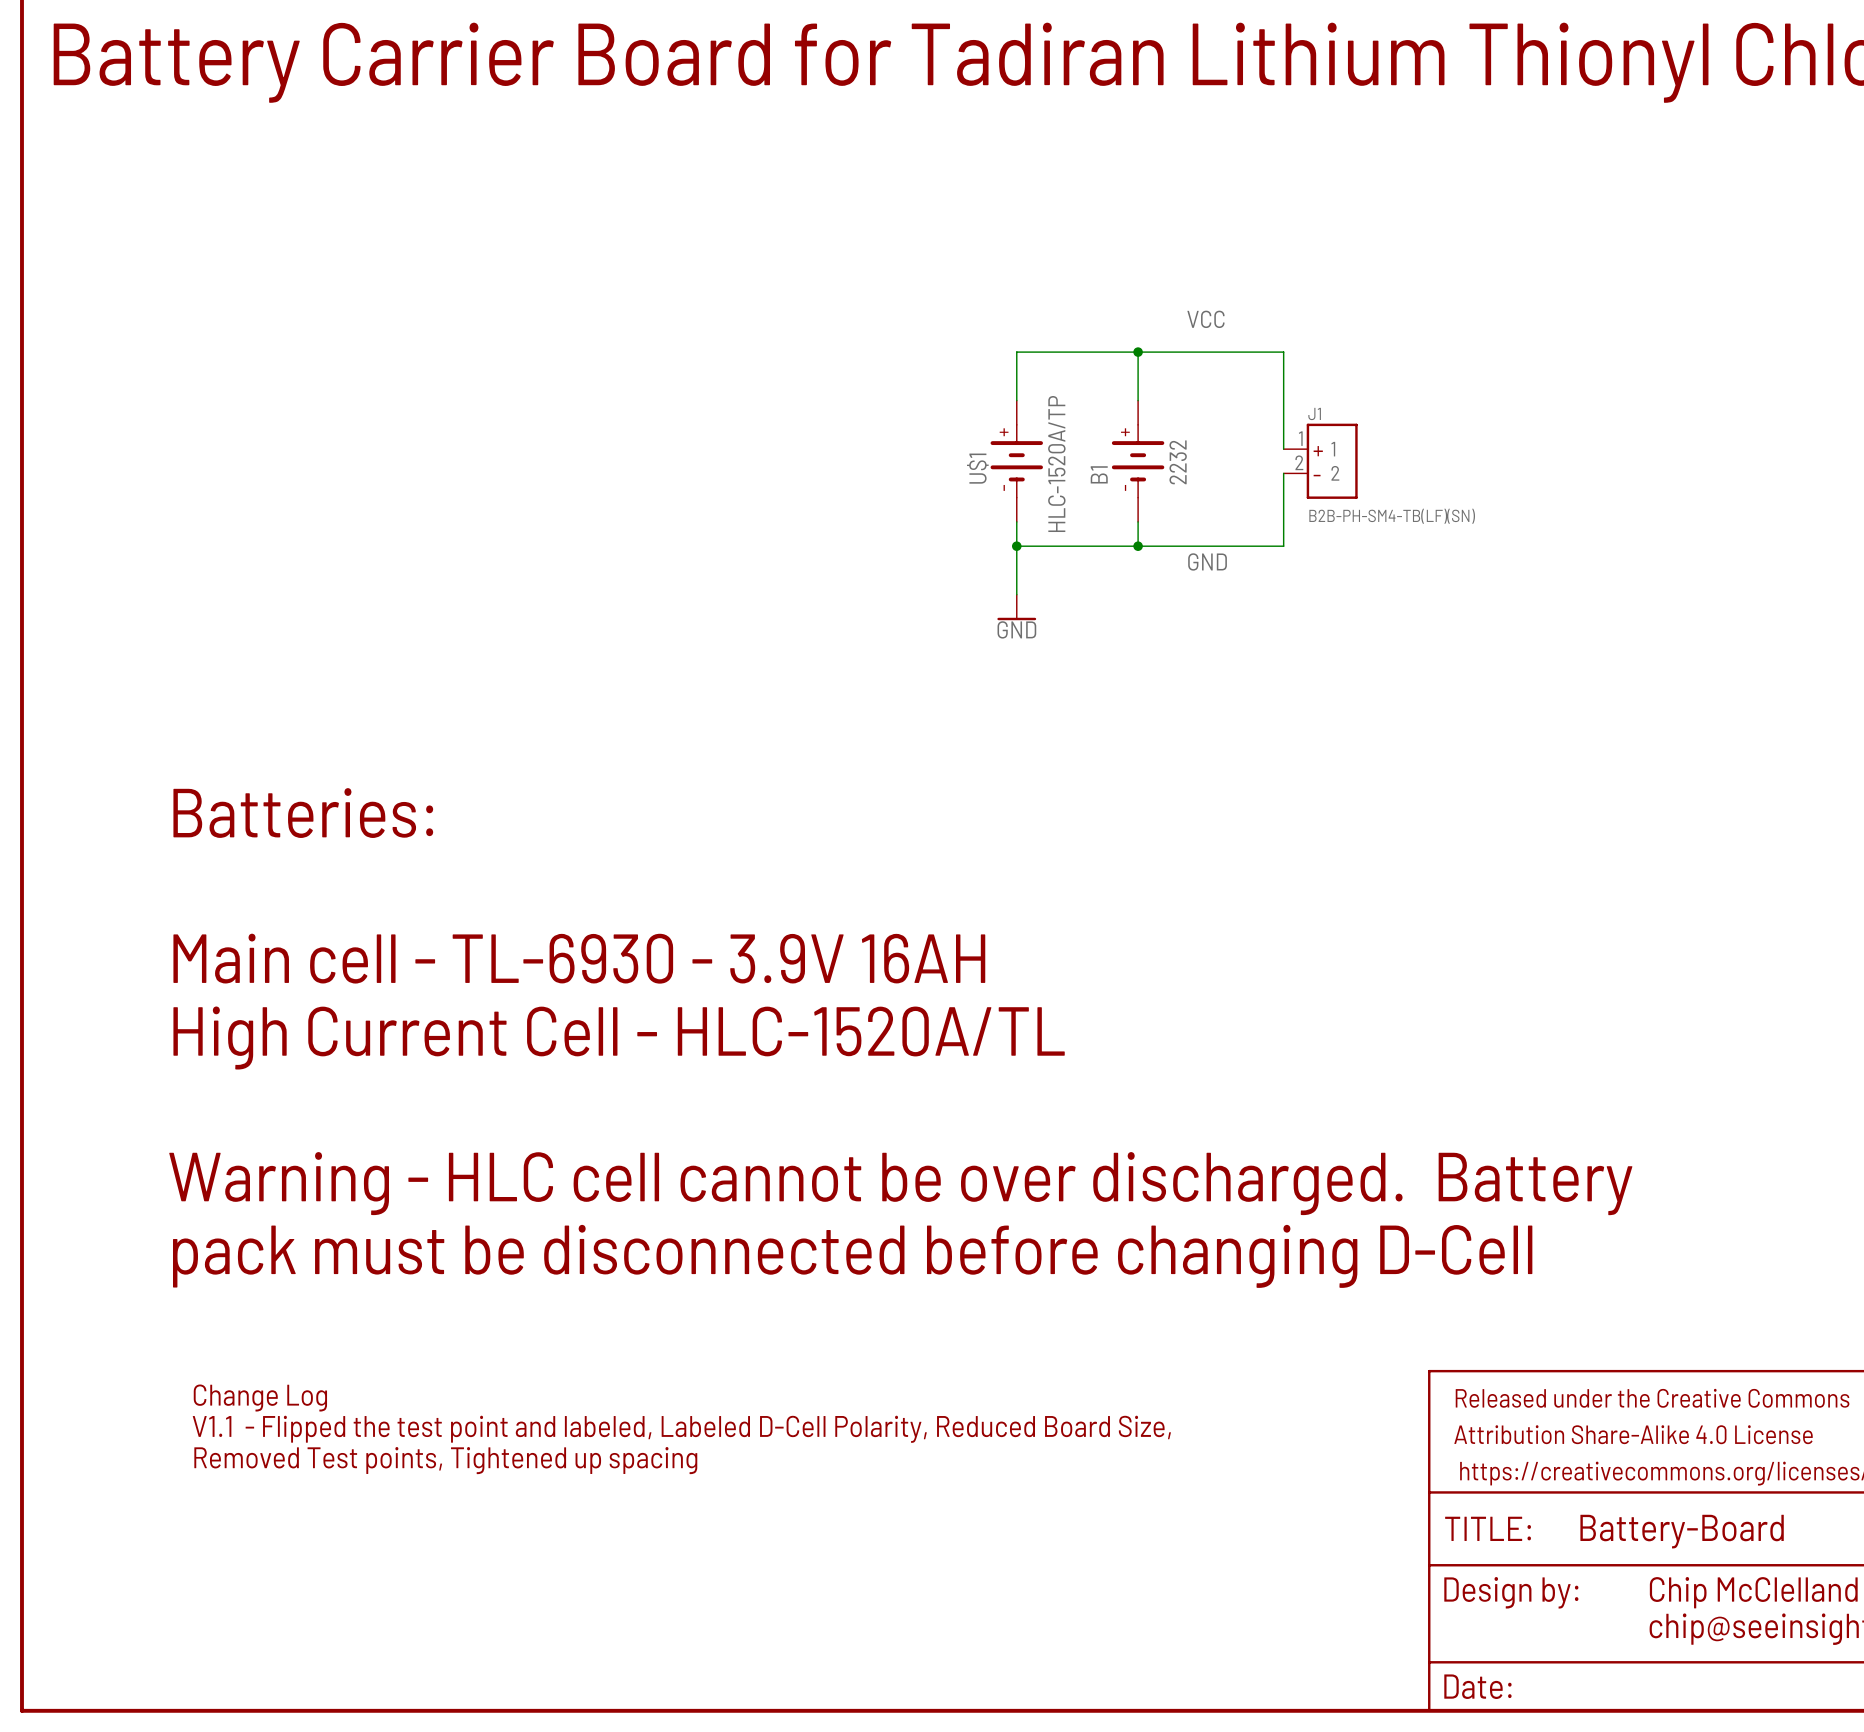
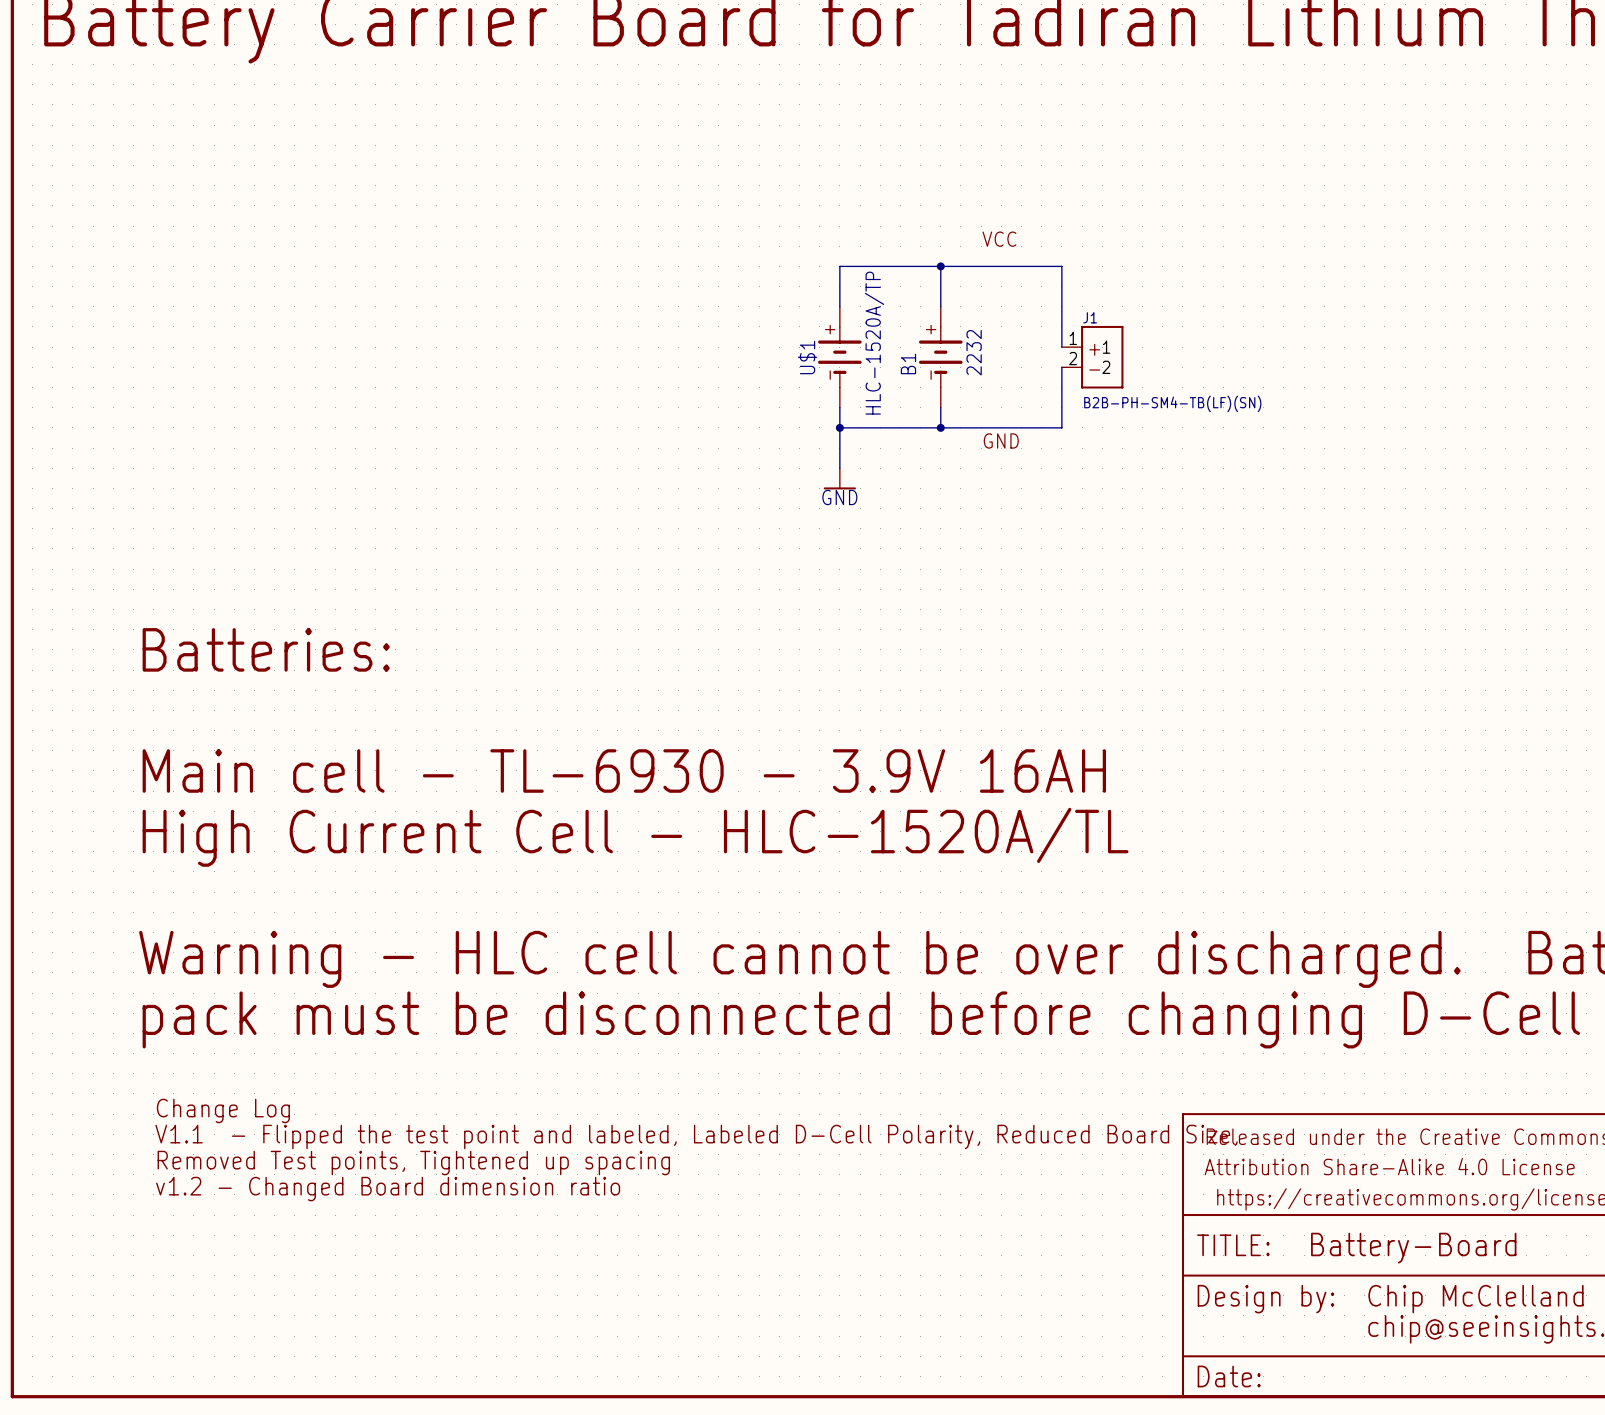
text: none -> Change Log (223, 1110)
text: Change Log (260, 1398) -> V1.1 - Flipped the test point and labeled, Labeled D-Cell Polarity, Reduced Board Size, (696, 1136)
text: V1.1 - Flipped the test point and labeled, Labeled D-Cell Polarity, Reduced Board Size, (681, 1429) -> Removed Test points, Tightened up spacing (413, 1163)
text: Removed Test points, Tightened up spacing (445, 1460) -> v1.2 - Changed Board dimension ratio (388, 1189)

